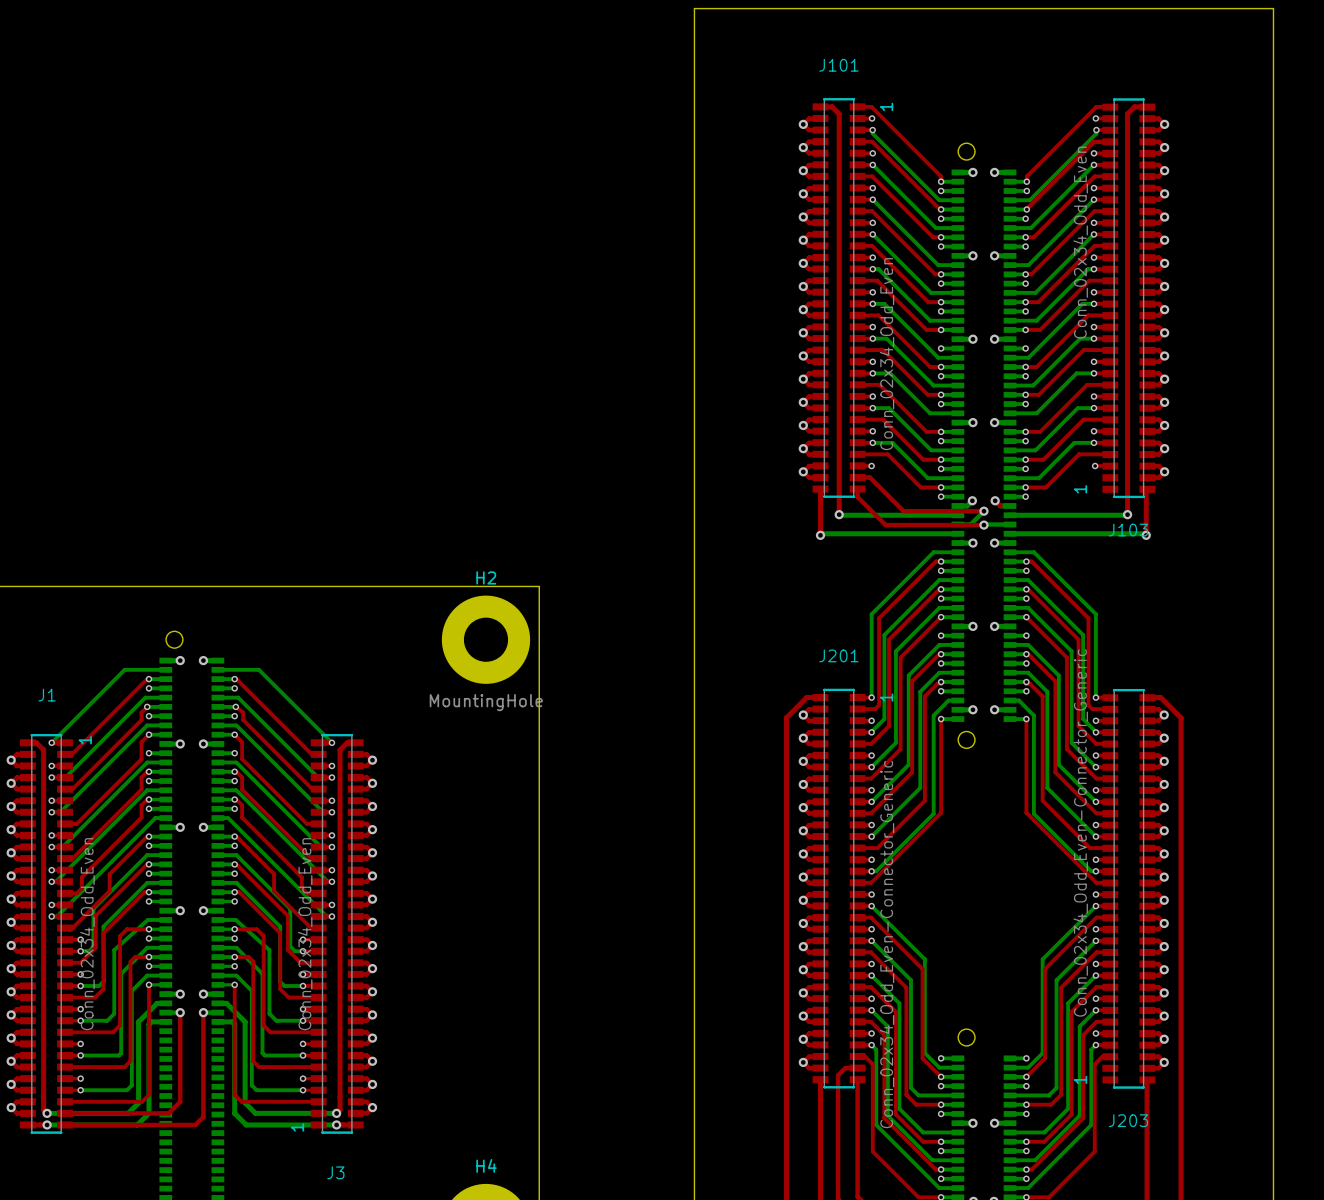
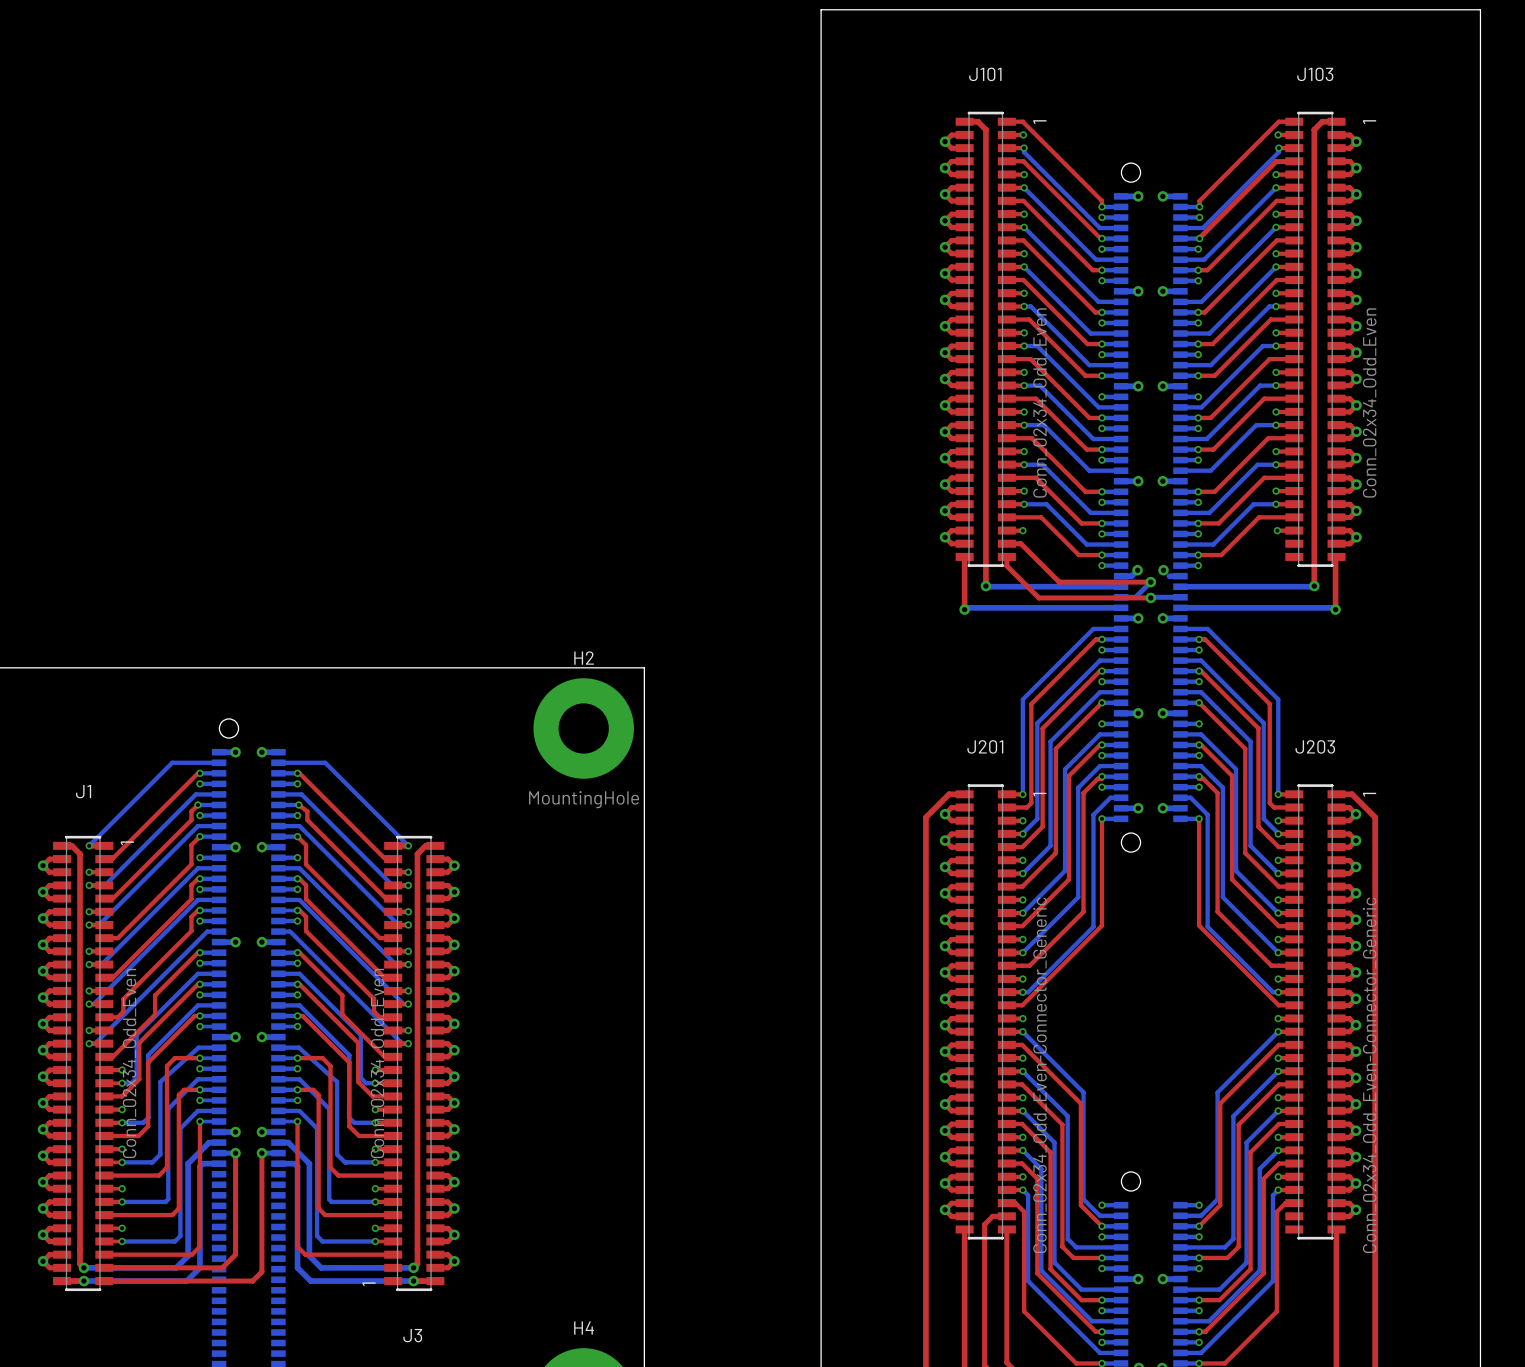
J103 rotation: 0° (1128, 298) -> 180° (1315, 339)
top track: (995, 500) (1000, 505) -> none
J203 rotation: 0° (1128, 888) -> 180° (1315, 1011)

